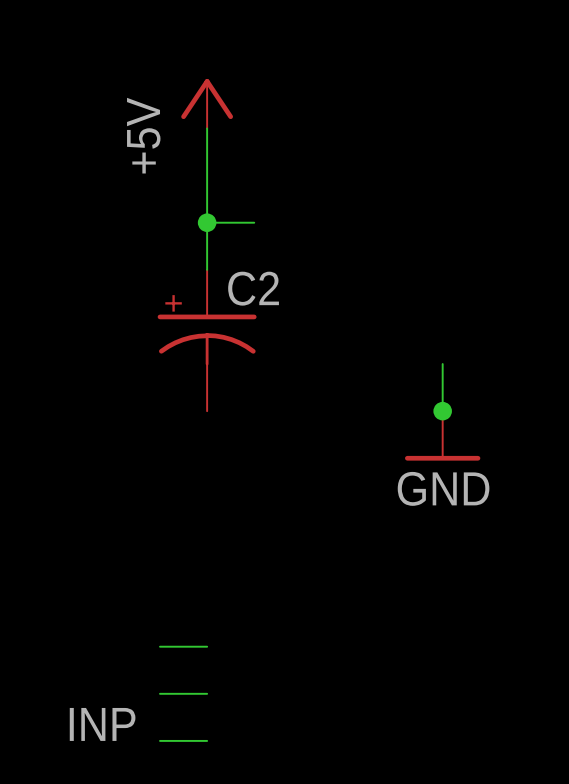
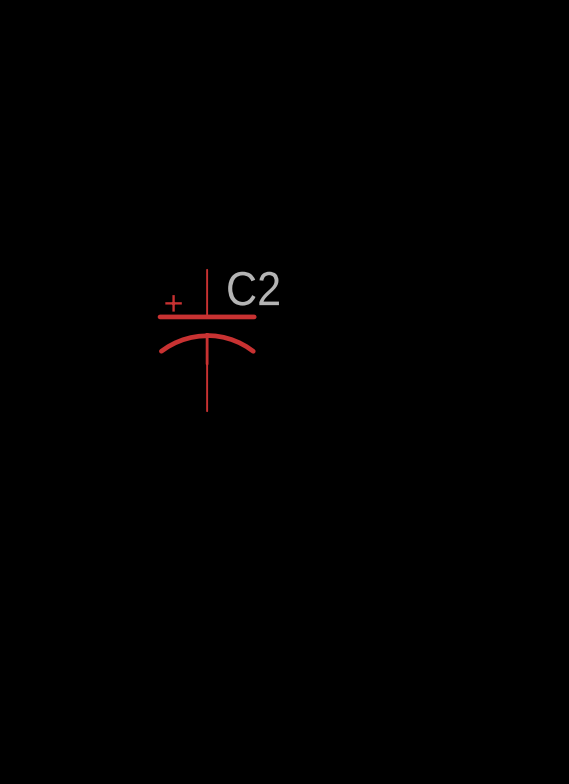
power symbol: +5V (207, 103) -> none
wire: (207, 128) (207, 269) -> none
wire: (207, 222) (254, 222) -> none
junction: (207, 222) -> none
wire: (442, 364) (442, 411) -> none
junction: (442, 411) -> none
power symbol: GND (442, 435) -> none
wire: (160, 646) (207, 646) -> none
wire: (160, 693) (207, 693) -> none
label: INP (102, 724) -> none
wire: (160, 740) (207, 740) -> none

